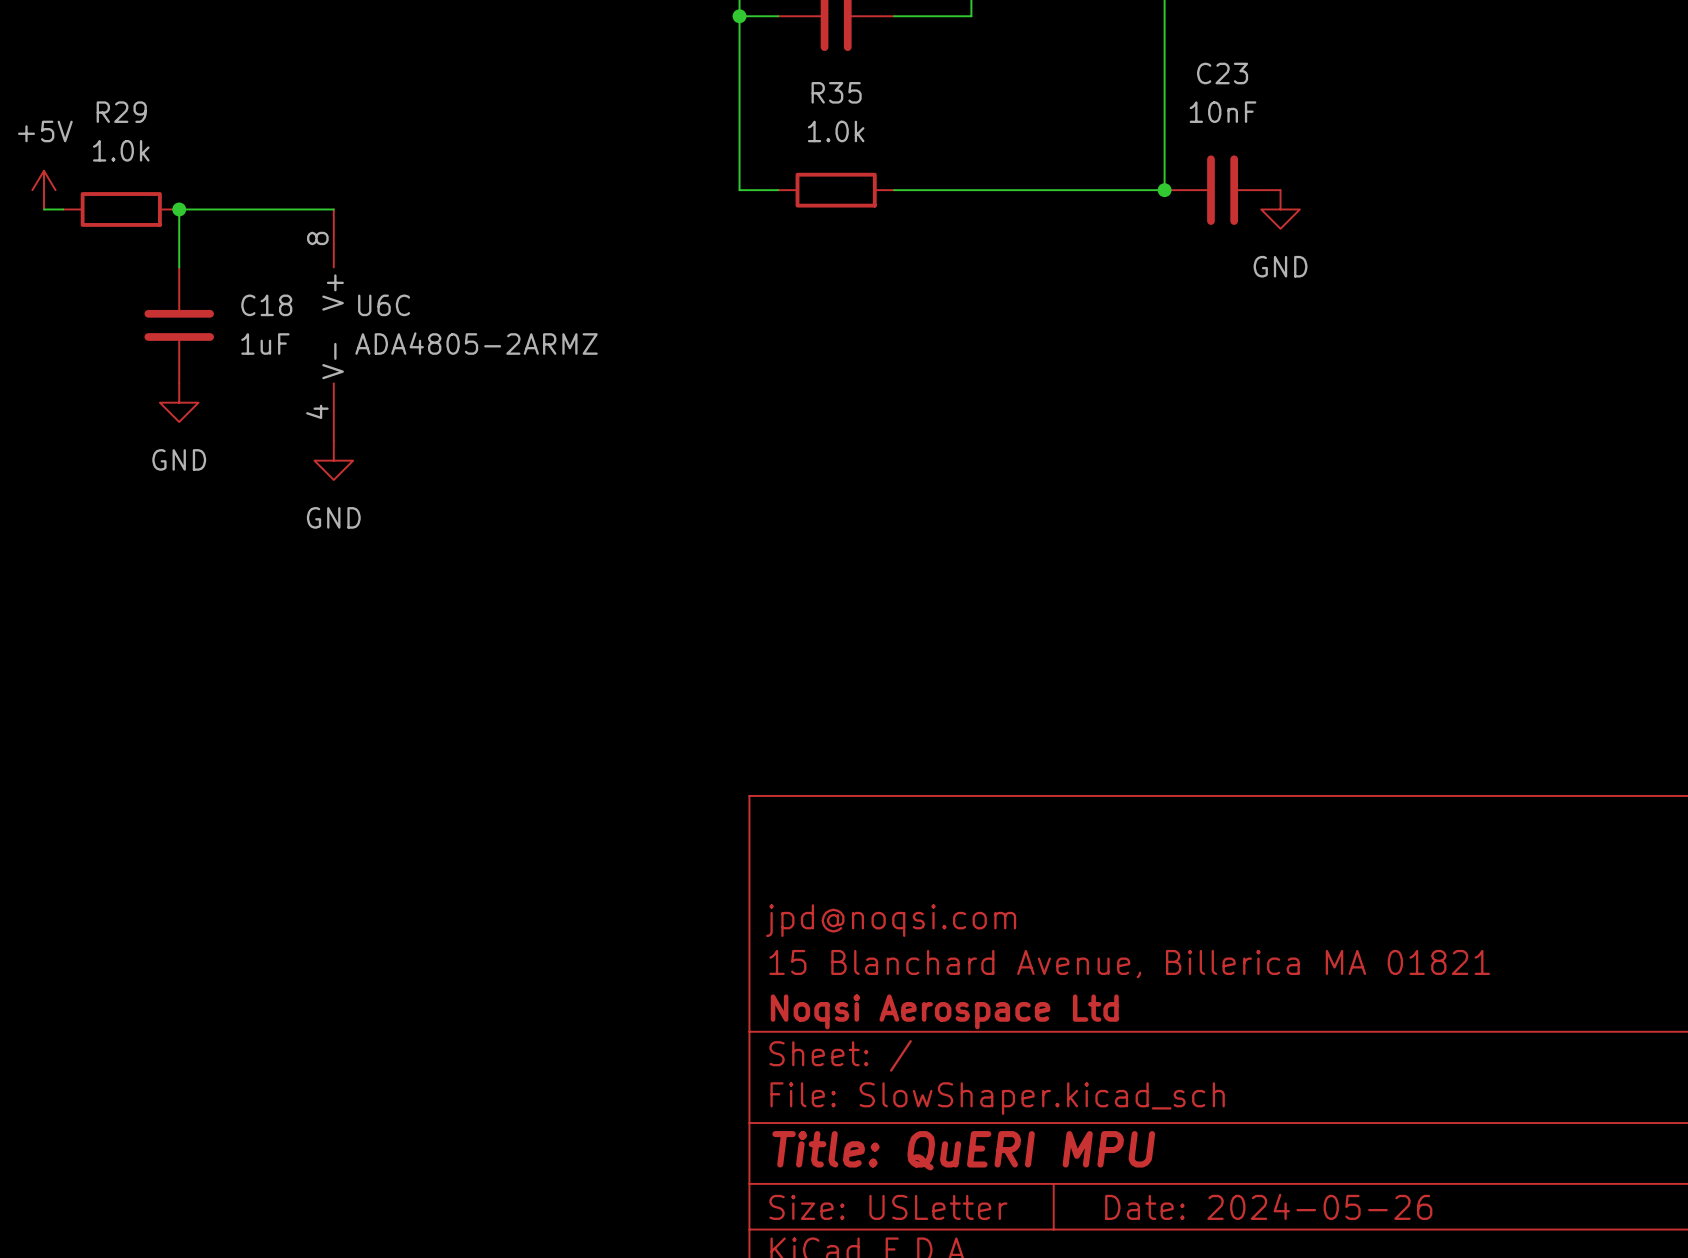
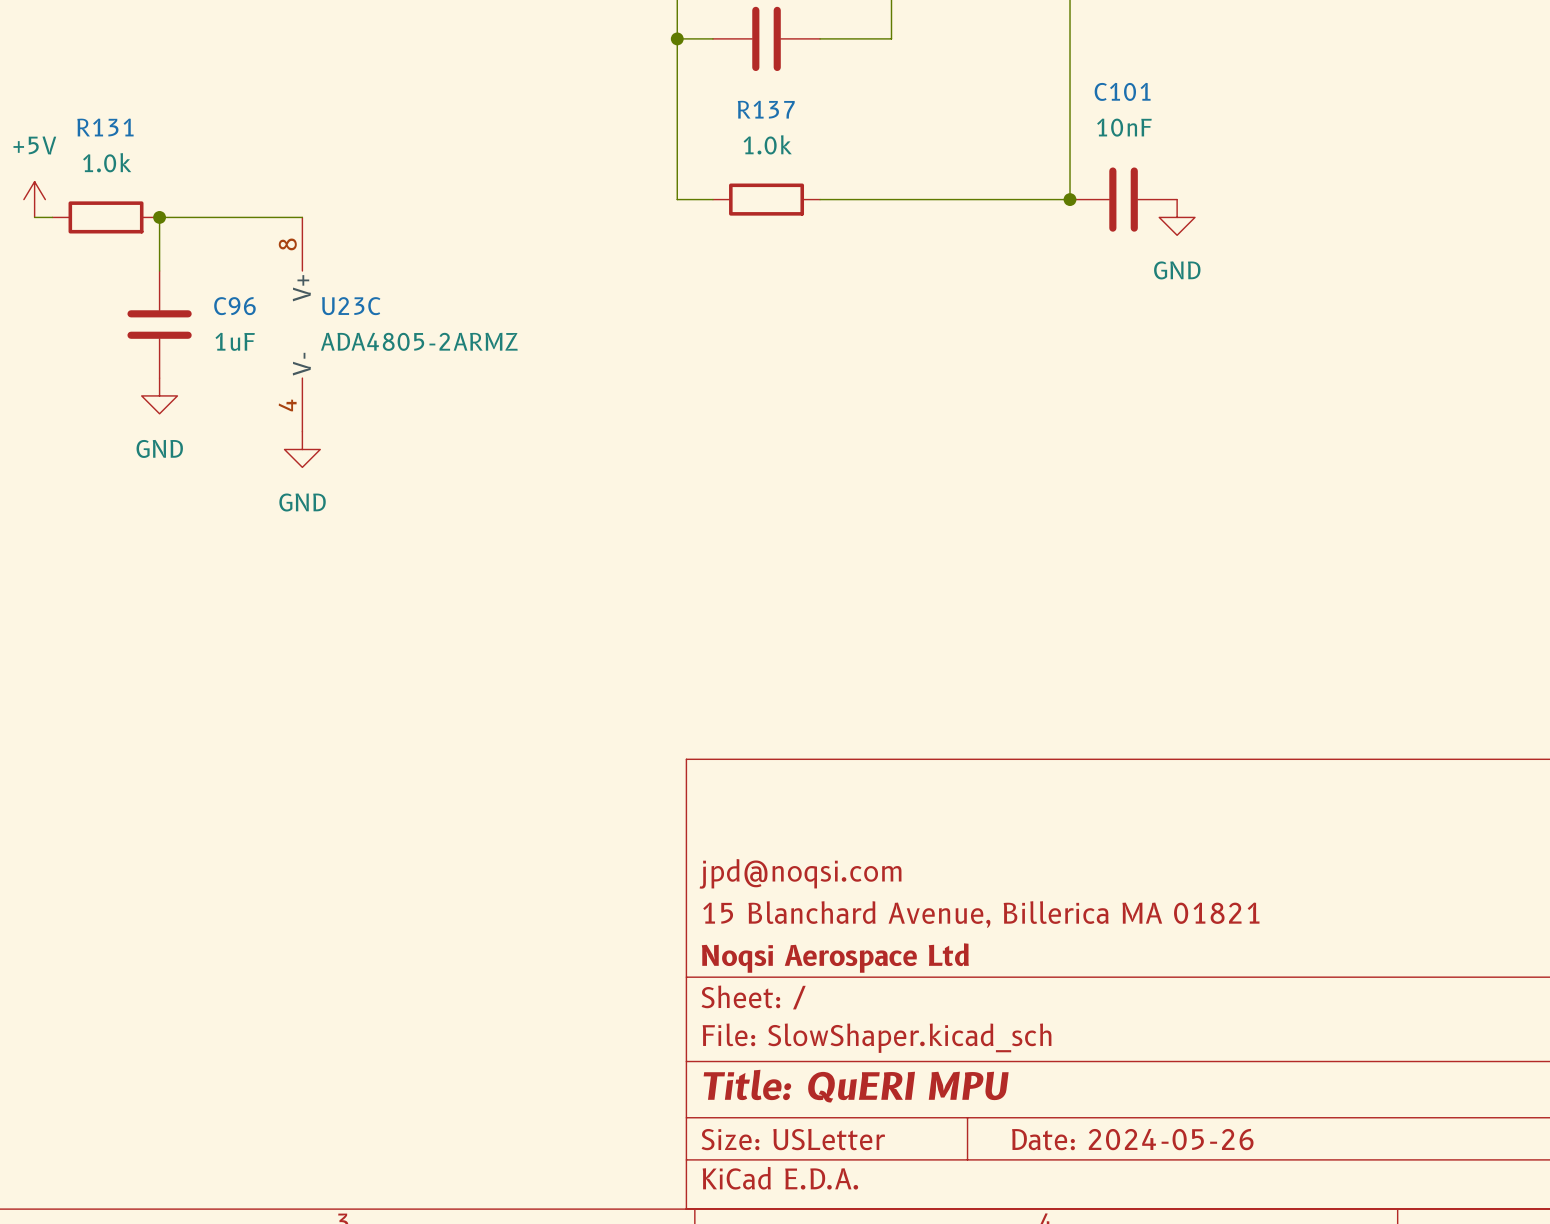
C23 name: C23 (1222, 73) -> C101 (1122, 91)
R35 name: R35 (836, 92) -> R137 (766, 109)
R29 name: R29 (121, 112) -> R131 (105, 127)
C18 name: C18 (266, 305) -> C96 (234, 306)
U6C name: U6C (384, 305) -> U23C (351, 306)

